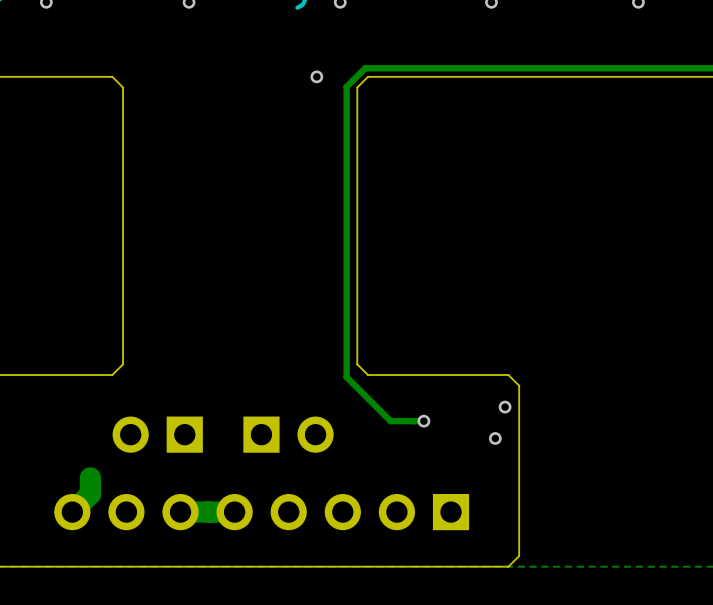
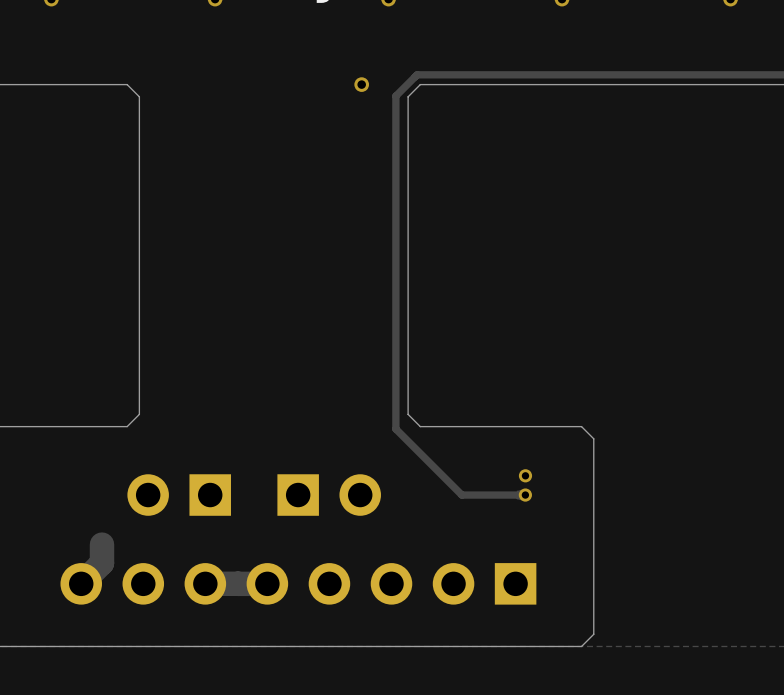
via: (505, 407) -> none
via: none -> (525, 475)
track: (423, 421) (390, 421) -> (525, 495) (461, 495) (446, 479)
via: (423, 421) -> none
via: none -> (525, 495)
via: (495, 438) -> none

